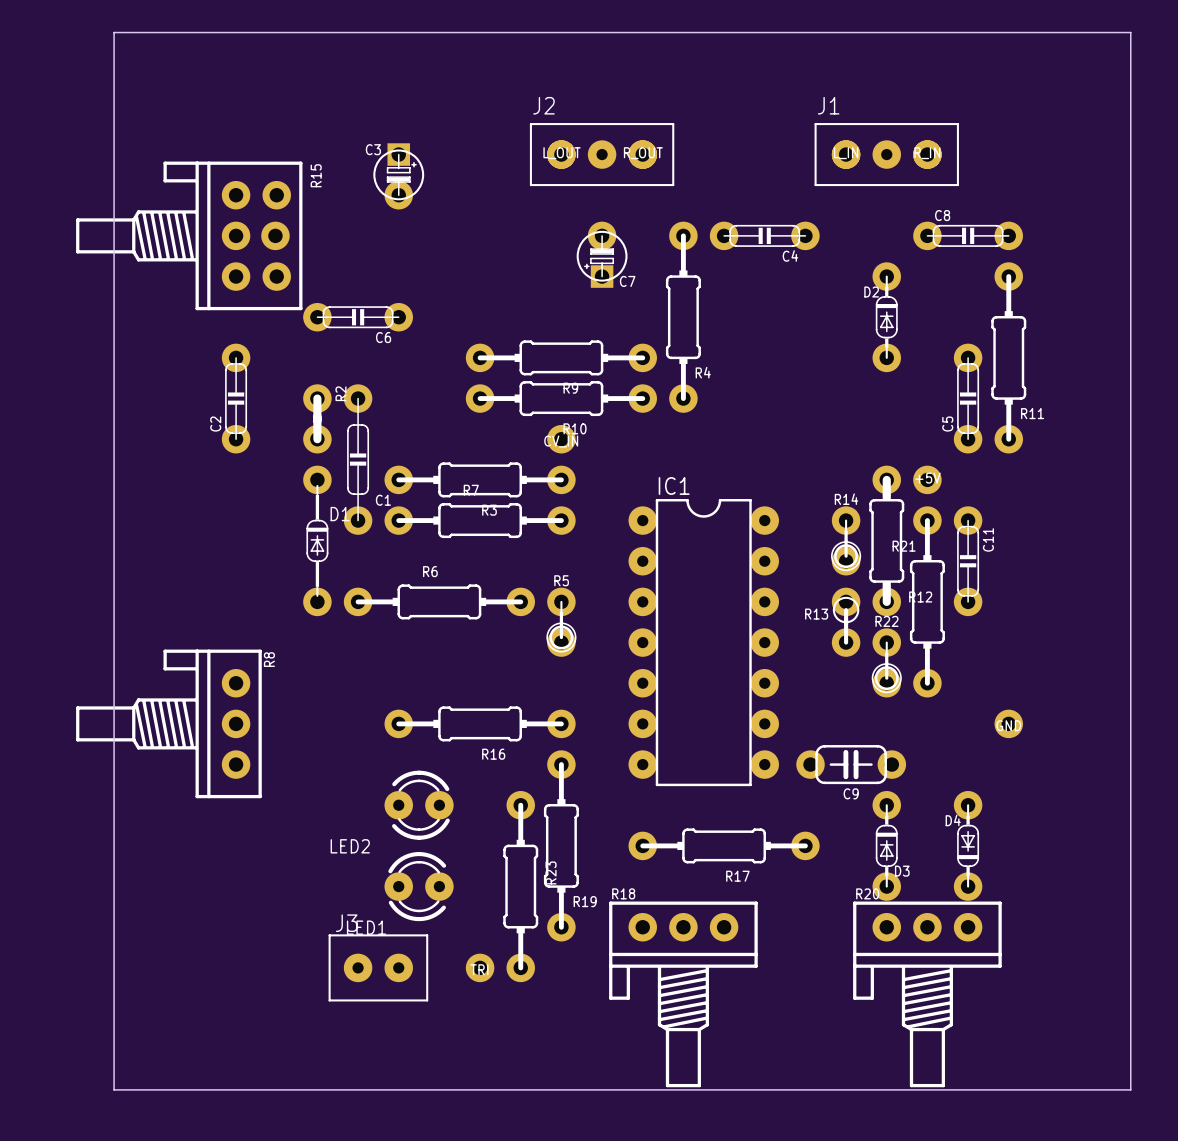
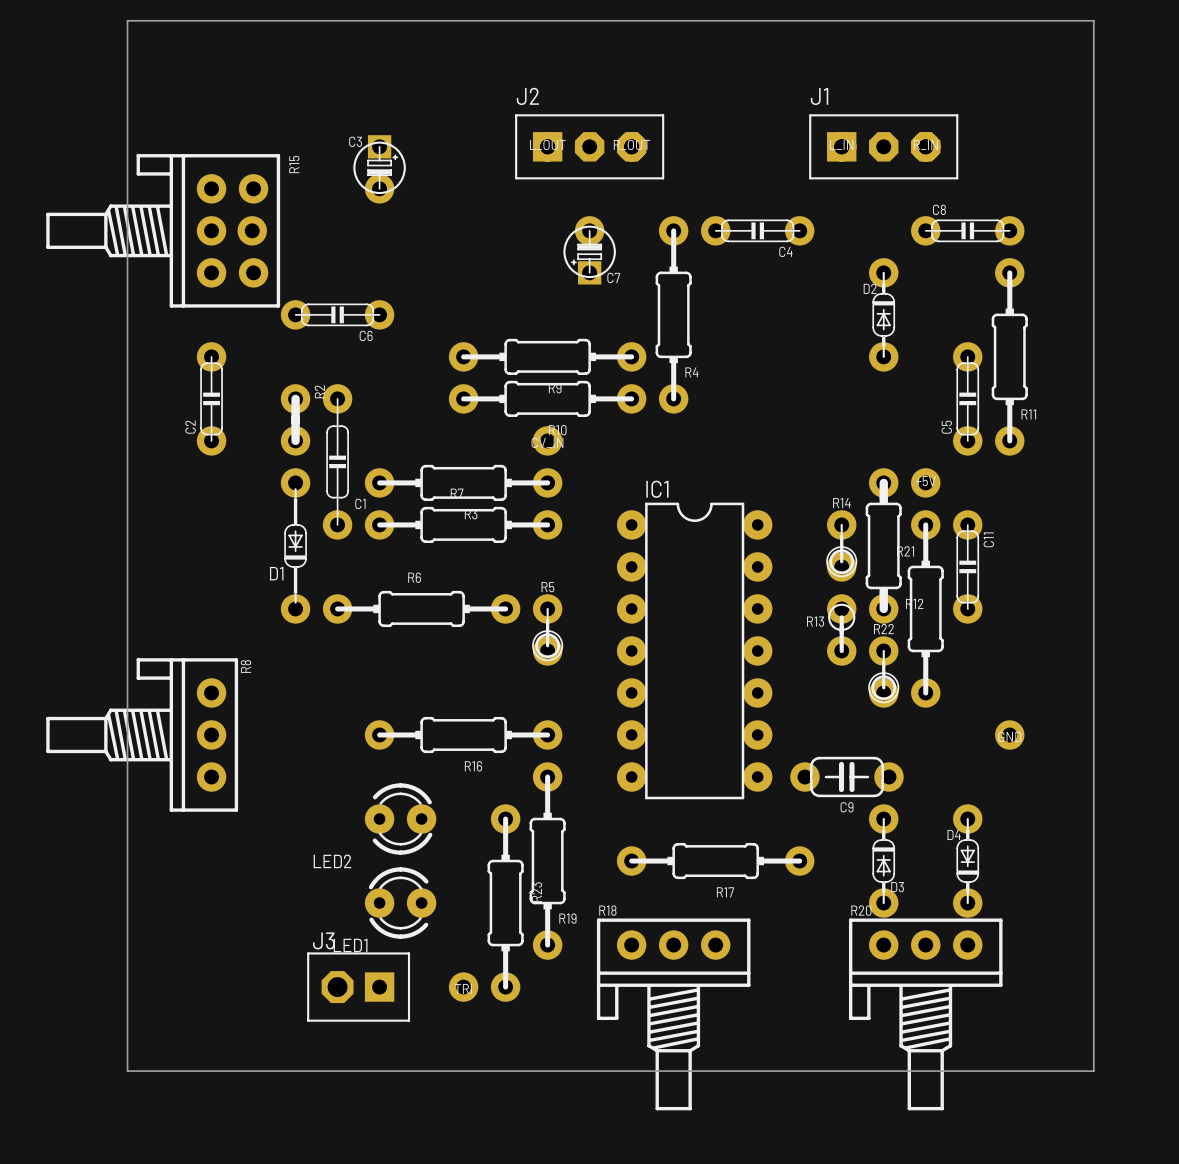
board edge: (154, 32) (114, 32) (114, 1089) (1130, 1089) (1130, 32) (1090, 32) -> (127, 20) (127, 1071) (1093, 1071) (1093, 20)
J2 footprint: [529, 123, 675, 187] -> [515, 114, 665, 180]
J1 footprint: [814, 123, 959, 187] -> [809, 114, 959, 180]
D1 rotation: 0° (317, 540) -> 180° (295, 545)
J3 footprint: [328, 934, 429, 1002] -> [307, 952, 411, 1022]

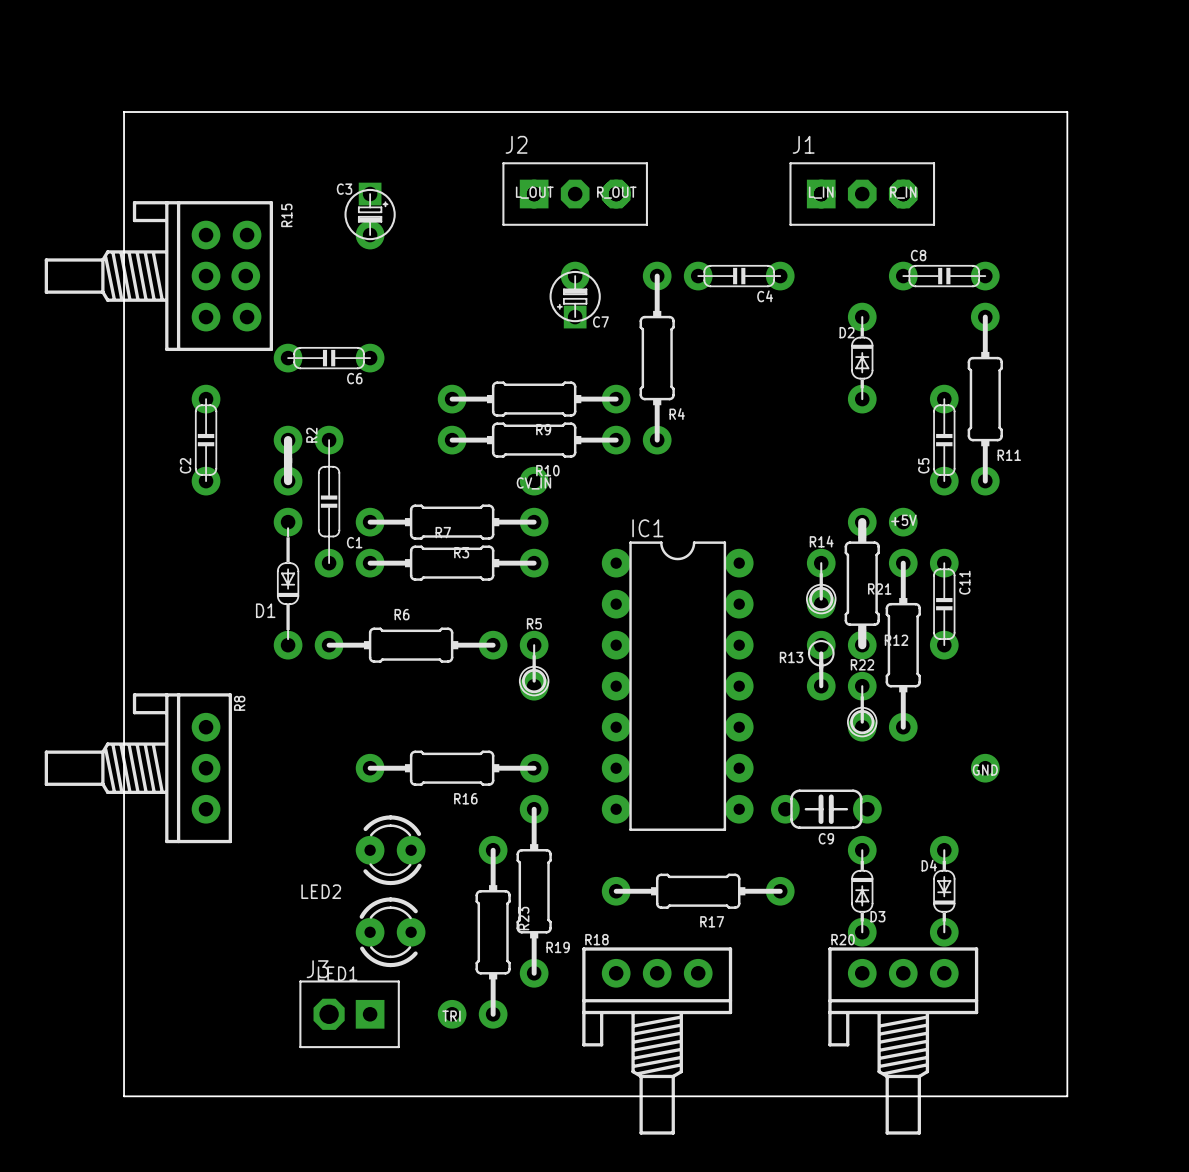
board edge: (127, 62) (127, 20) (1093, 20) (1093, 62) -> (124, 112) (1067, 112)

